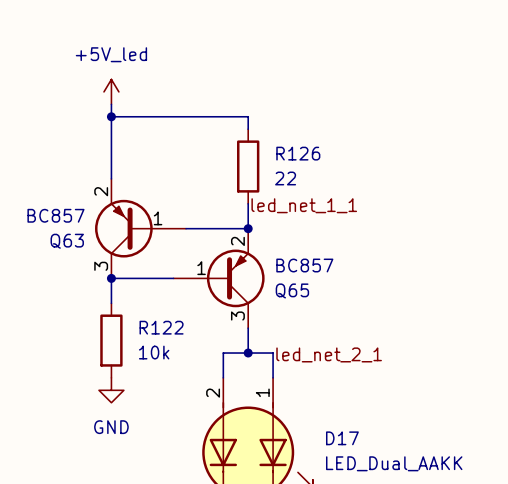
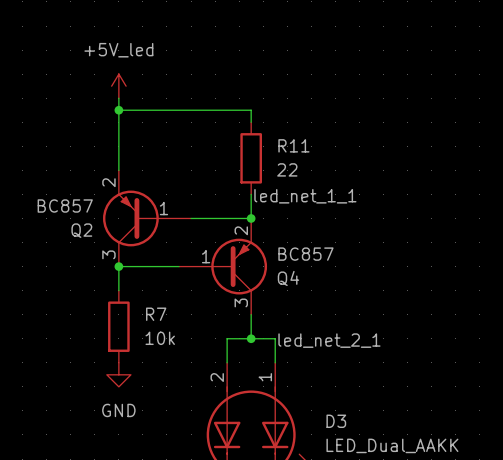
R126 name: R126 (298, 153) -> R11 (293, 145)
Q63 name: Q63 (67, 241) -> Q2 (81, 230)
Q65 name: Q65 (292, 290) -> Q4 (288, 278)
R122 name: R122 (161, 327) -> R7 (156, 314)
D17 name: D17 (342, 438) -> D3 (336, 421)

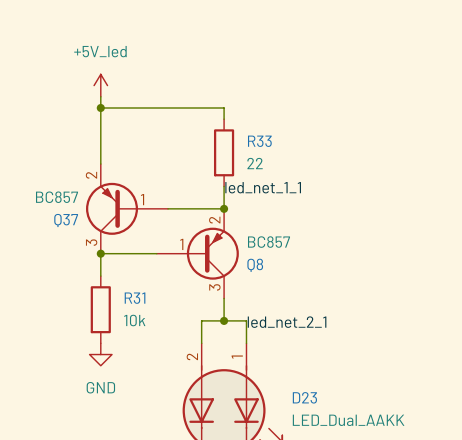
R11 name: R11 (293, 145) -> R33 (259, 141)
Q2 name: Q2 (81, 230) -> Q37 (66, 220)
Q4 name: Q4 (288, 278) -> Q8 (255, 265)
R7 name: R7 (156, 314) -> R31 (135, 298)
D3 name: D3 (336, 421) -> D23 (304, 397)

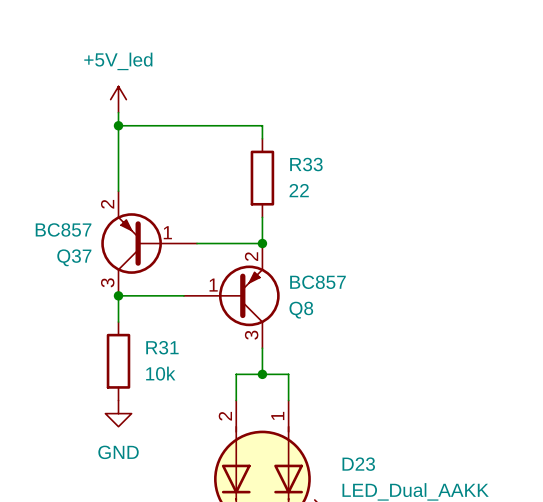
label: led_net_1_1 (263, 187) -> none
label: led_net_2_1 (287, 322) -> none

